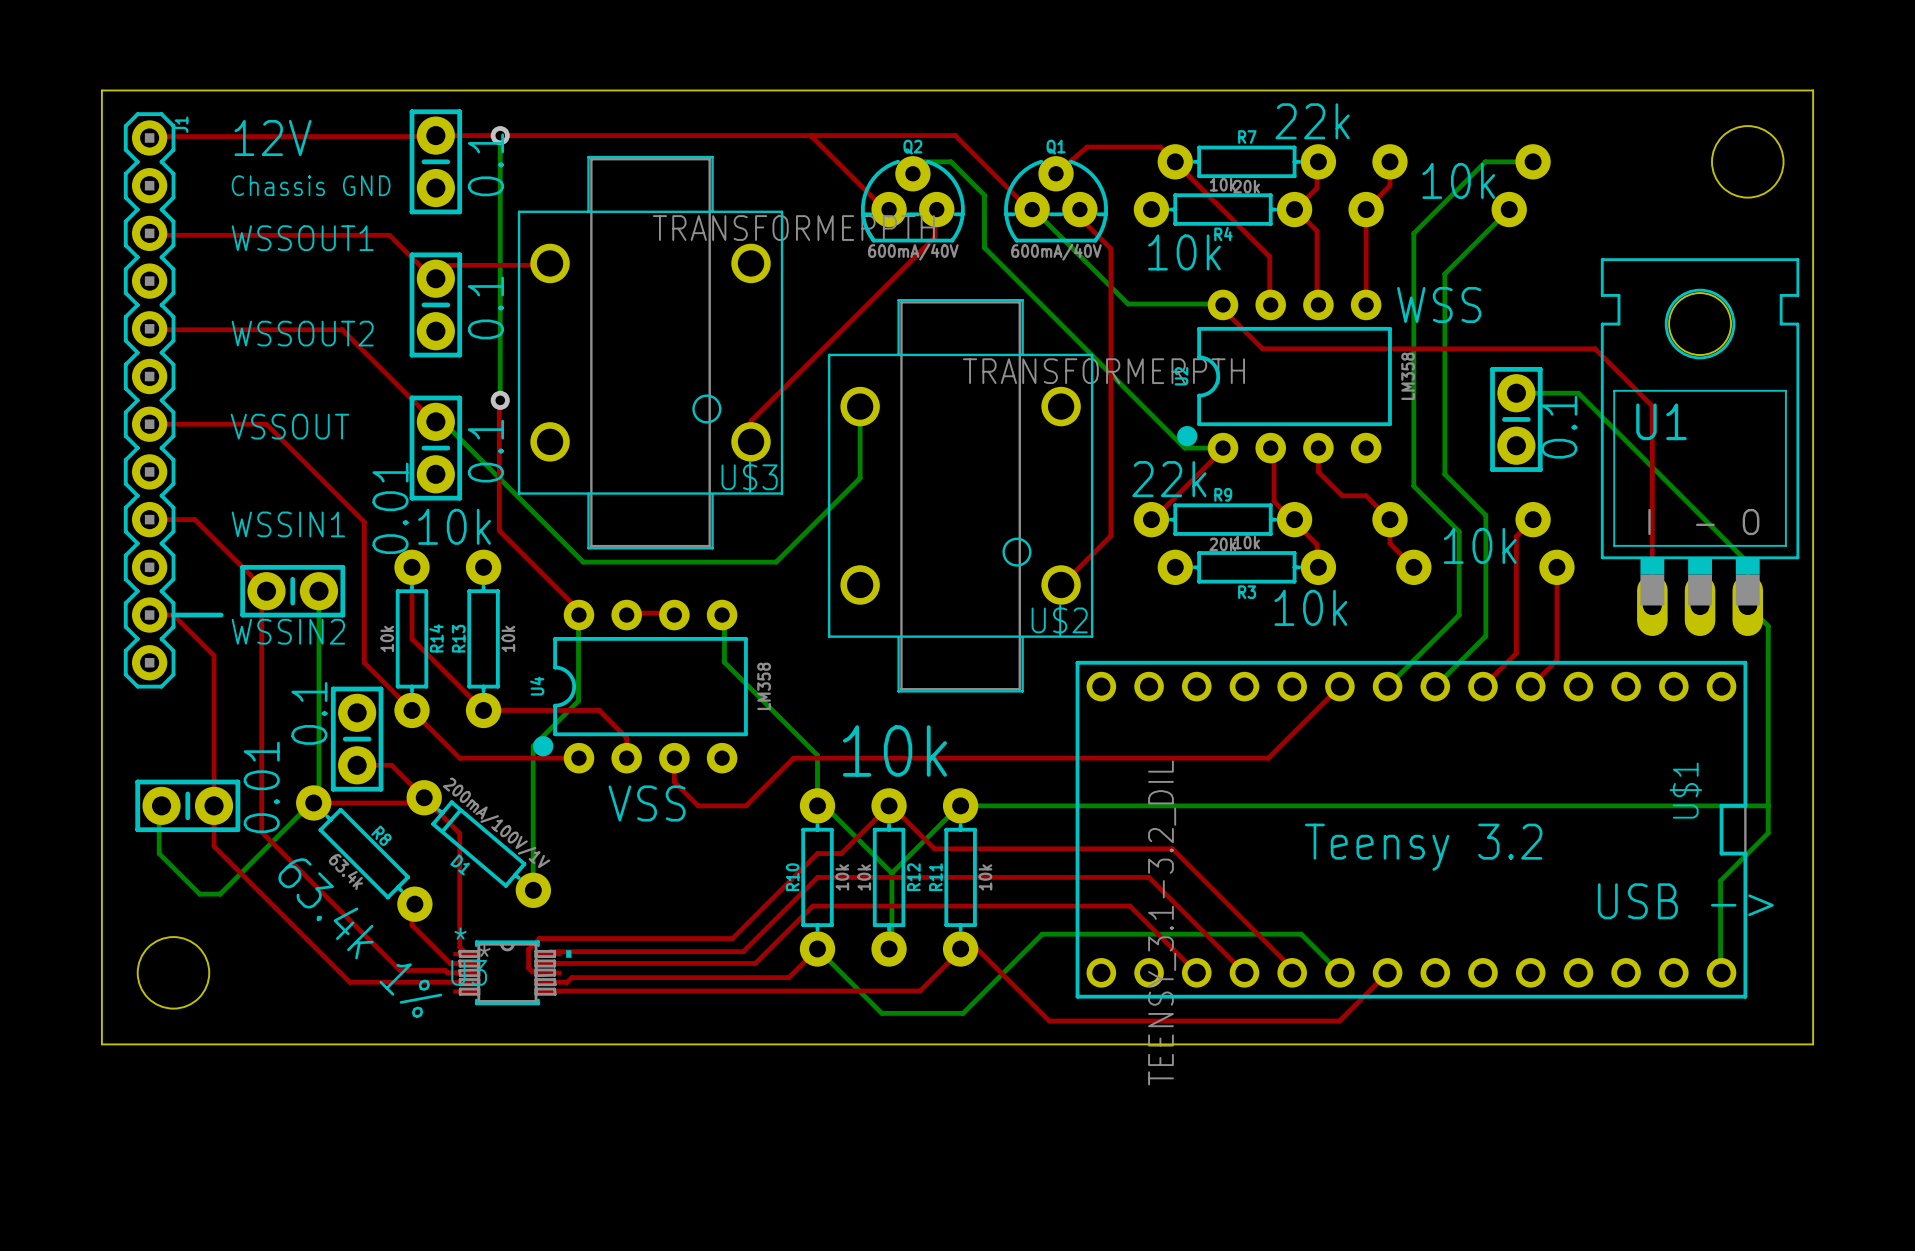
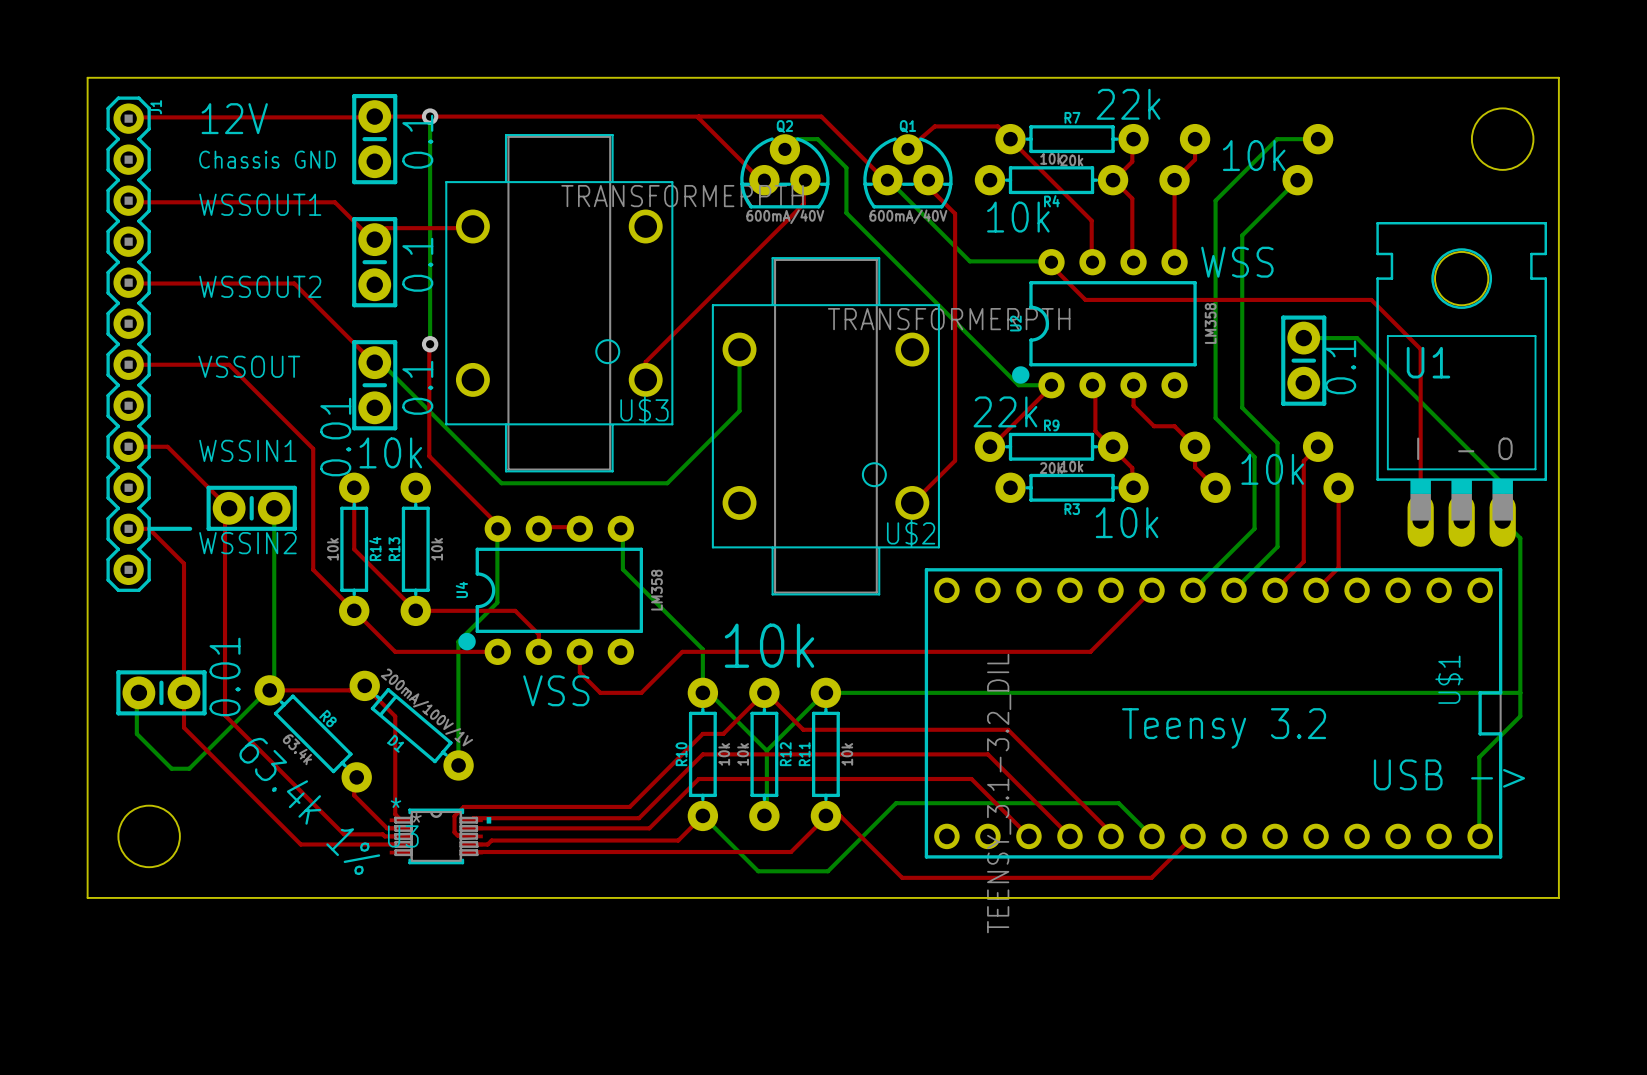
text: 0.1 (309, 713) -> none
part: (357, 739) -> none
top track: (357, 765) (391, 765) (424, 797) -> none

